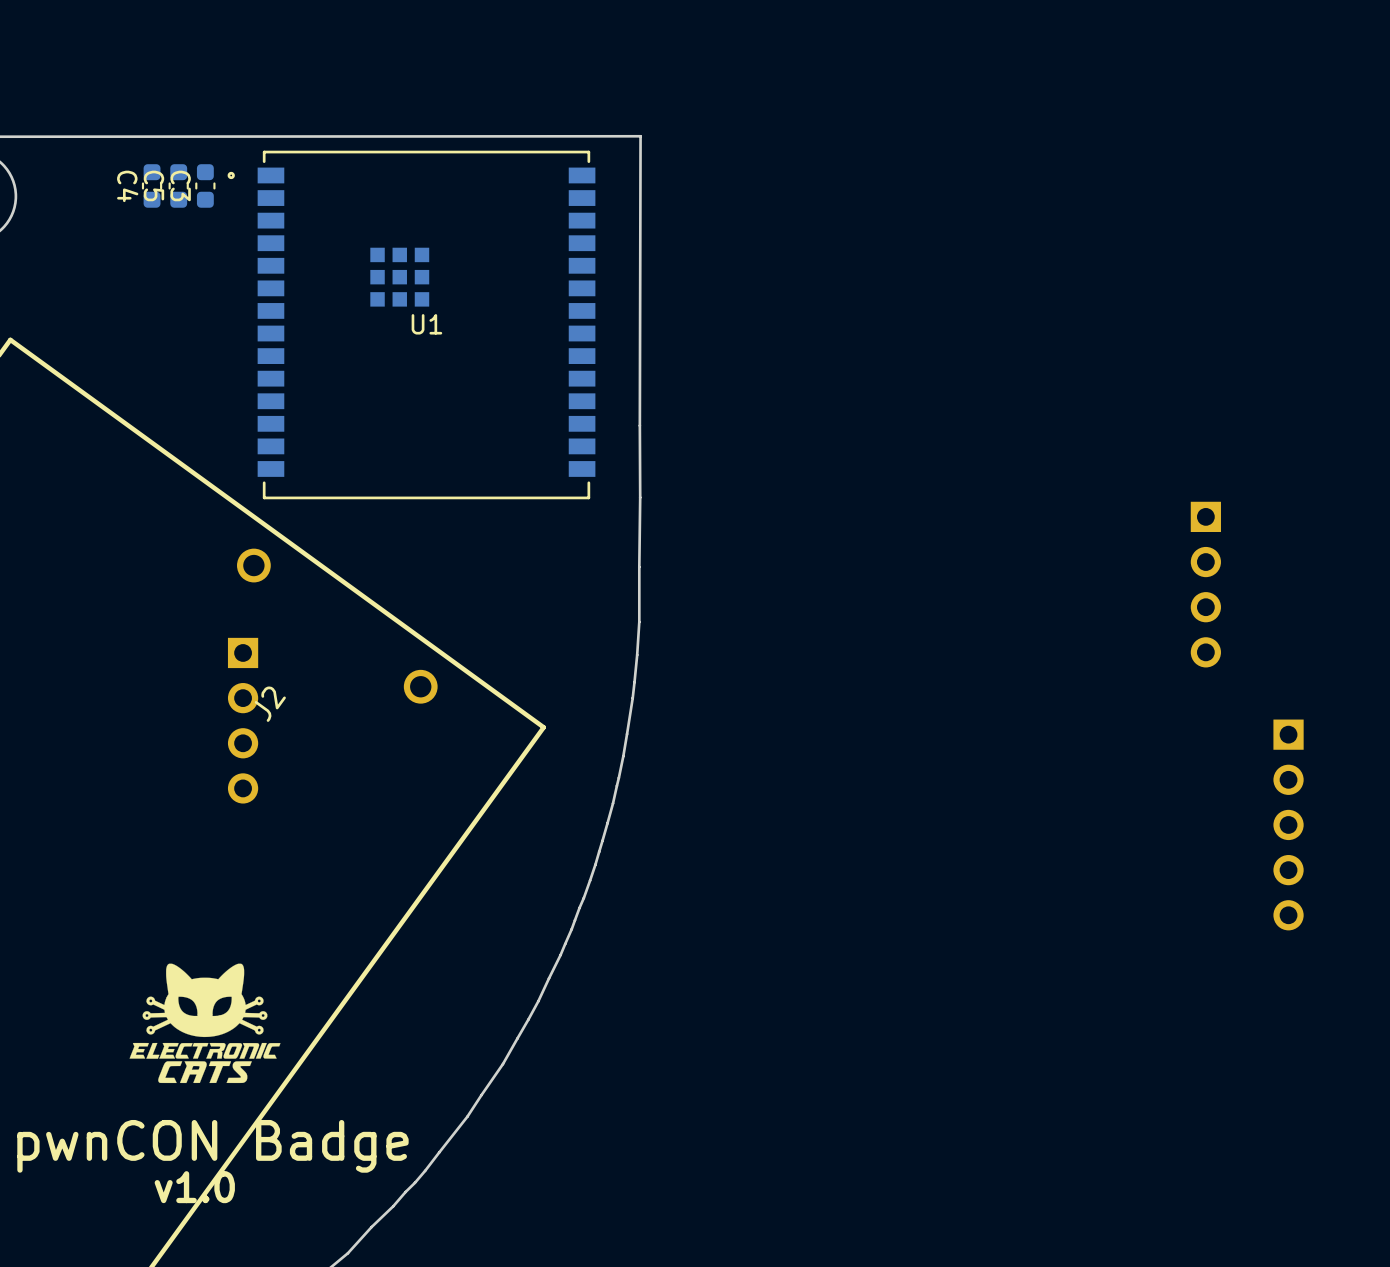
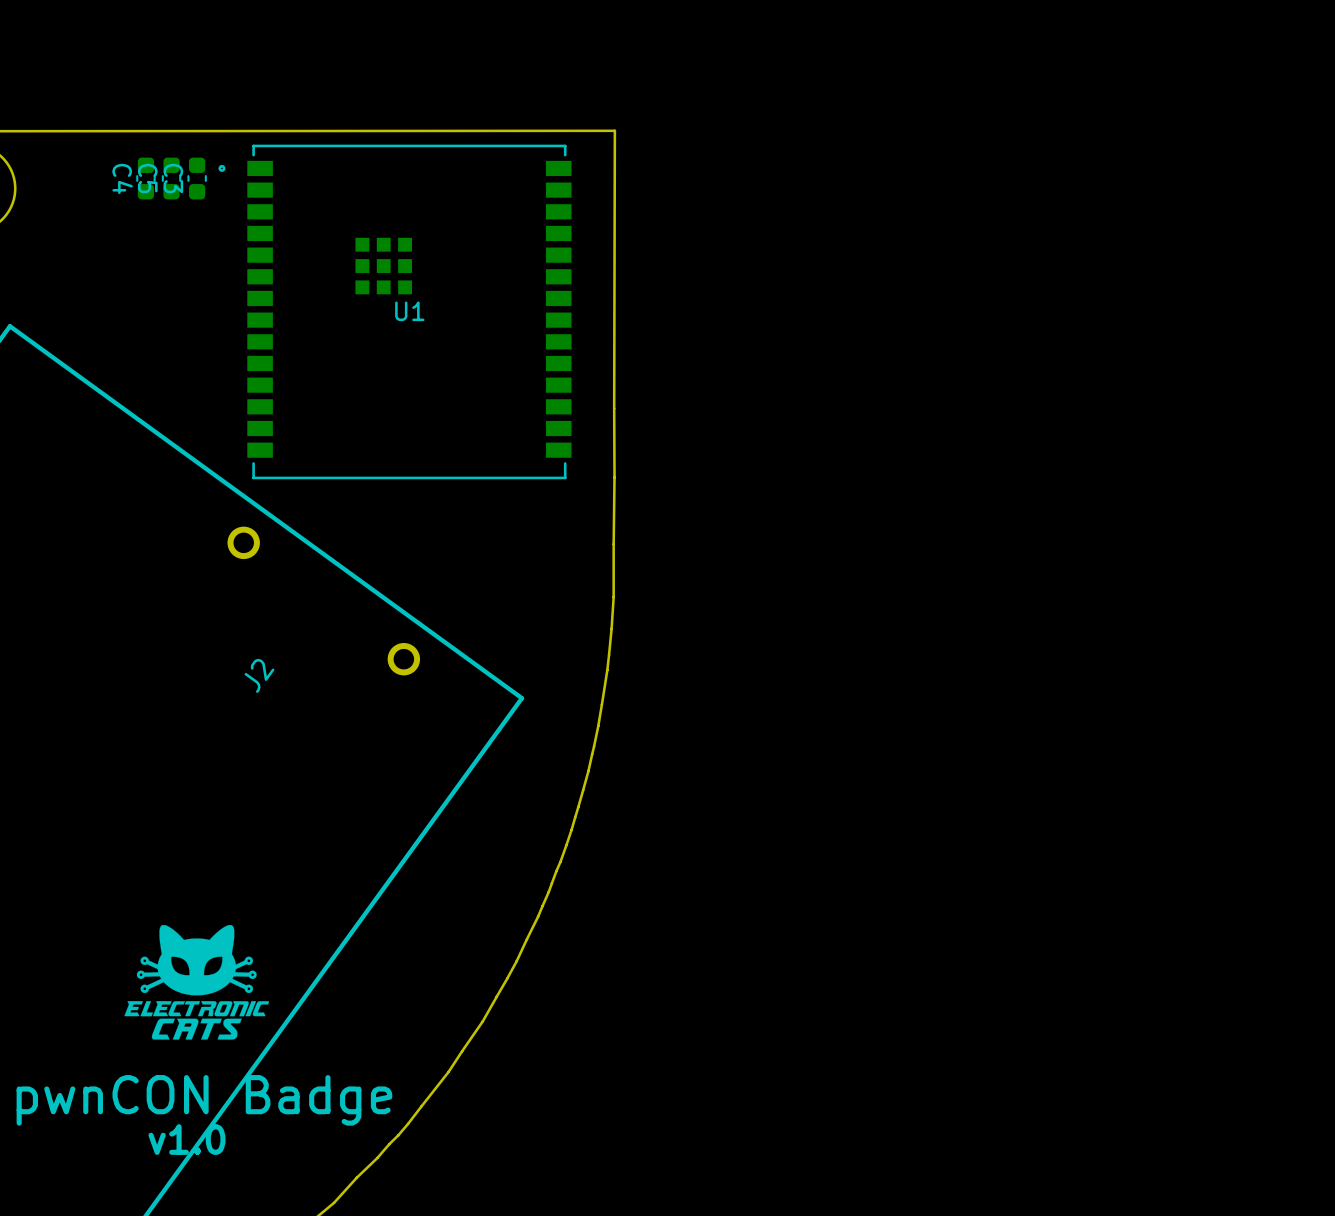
part: (1205, 584) -> none
part: (243, 720) -> none
part: (1288, 824) -> none

